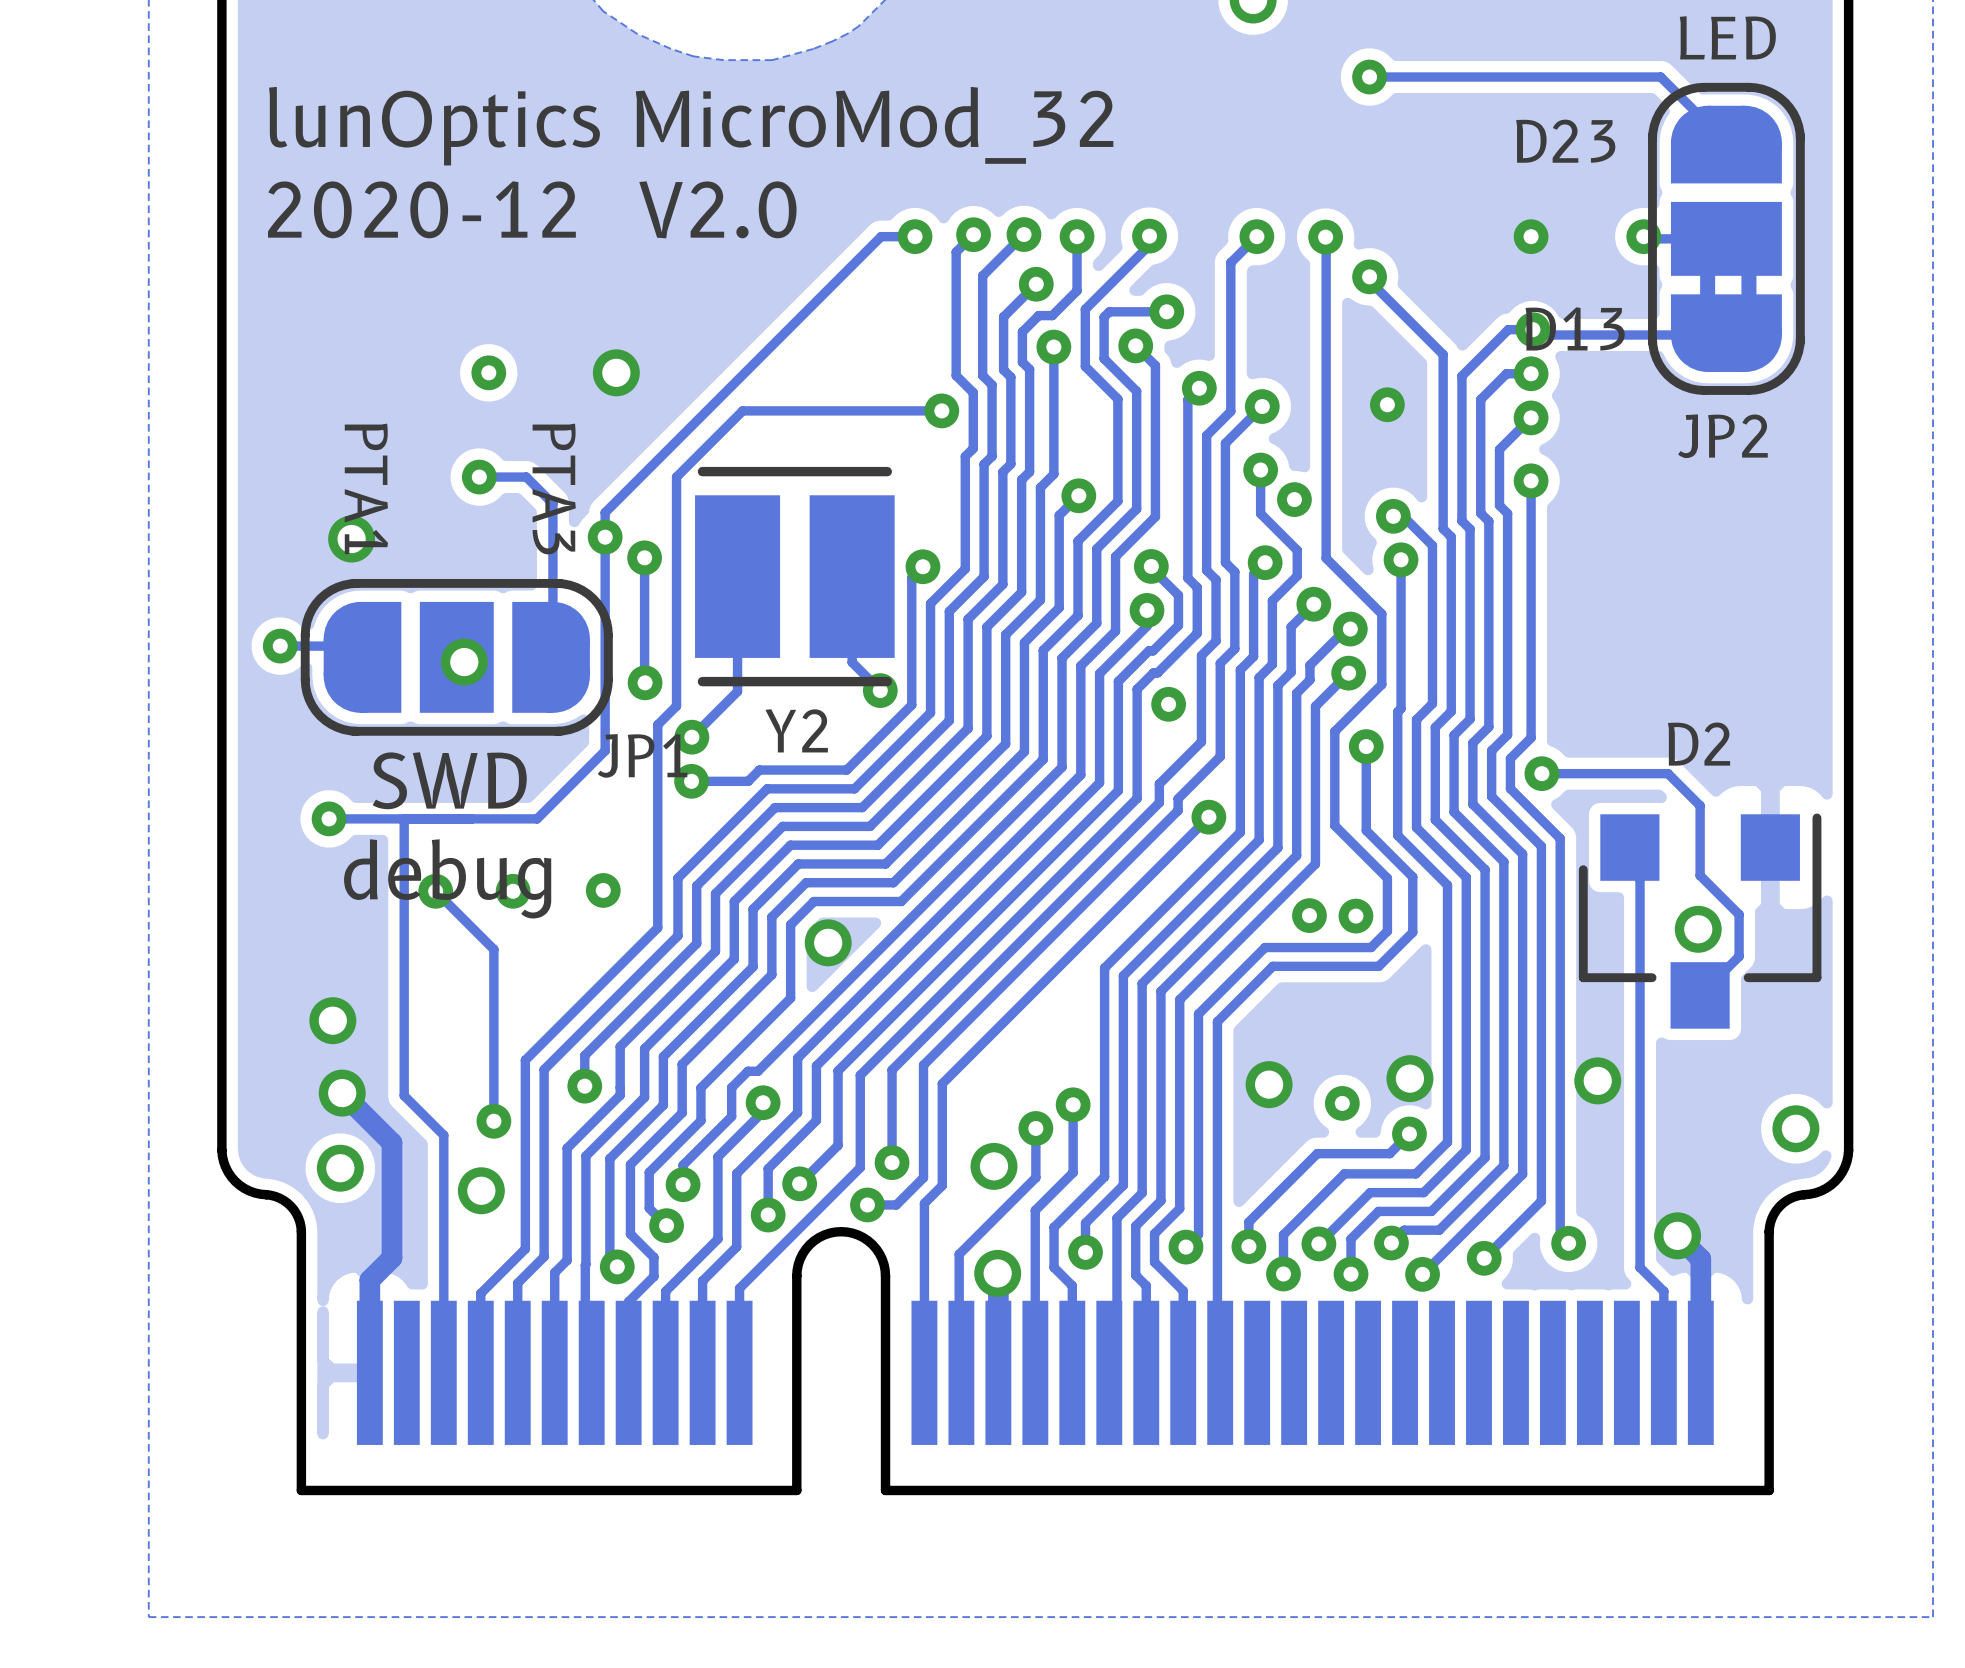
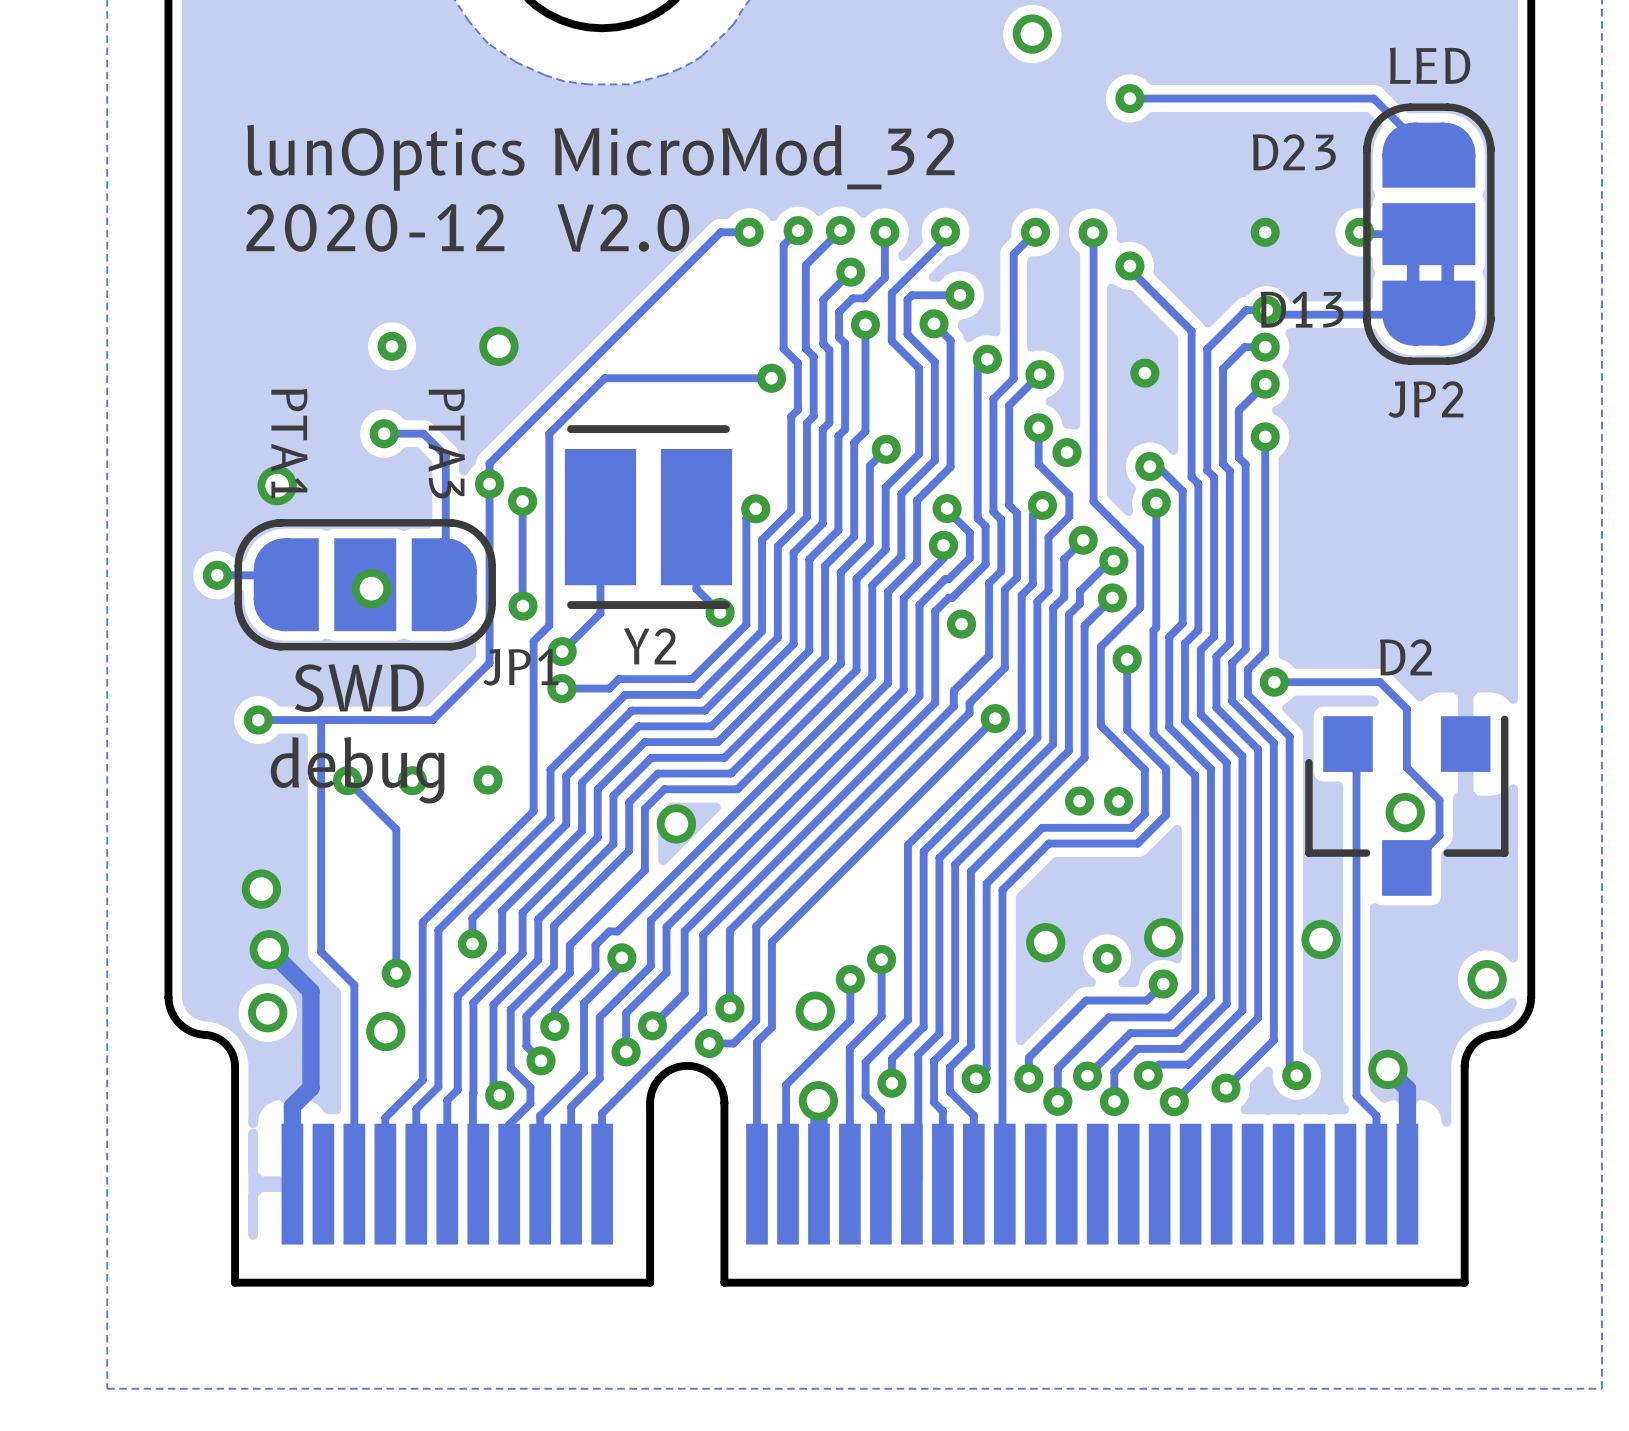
text position: lunOptics MicroMod_32 (691, 126) -> lunOptics MicroMod_32 (600, 157)
text position: 2020-12 V2.0 (532, 209) -> 2020-12 V2.0 (467, 227)

